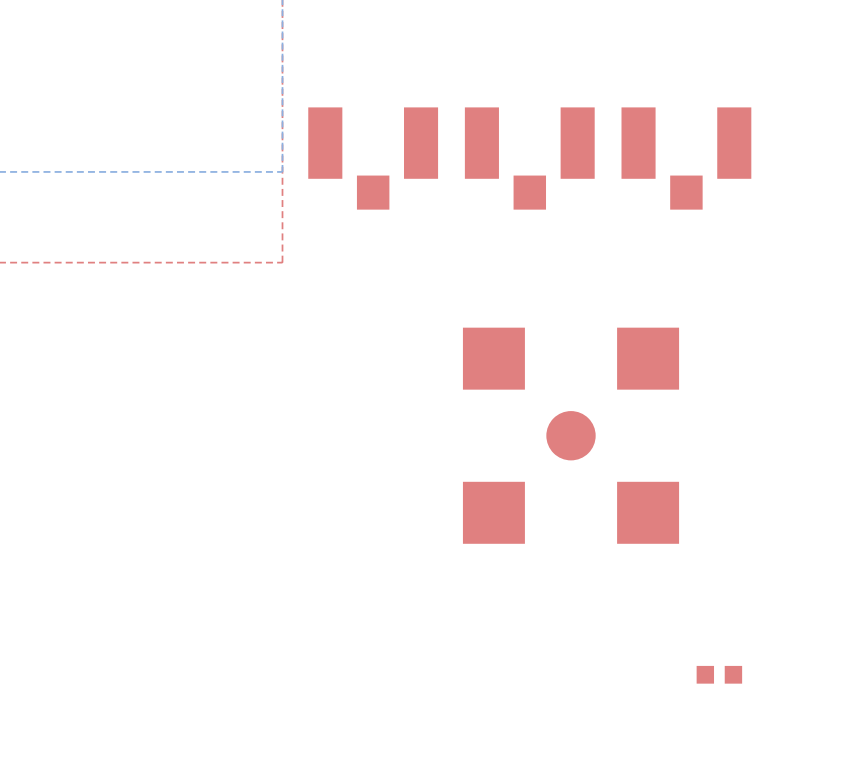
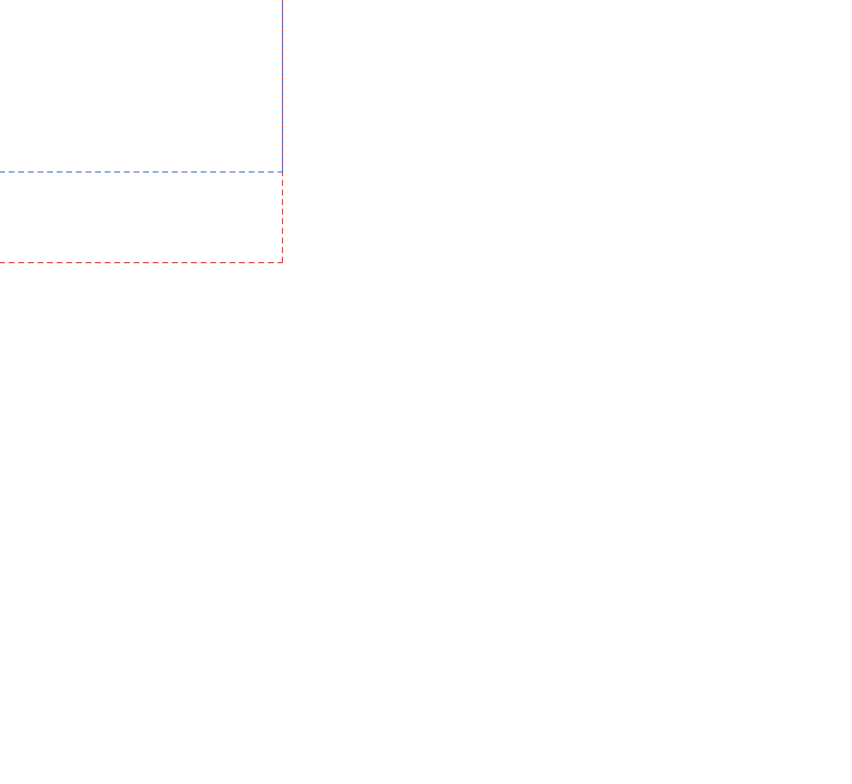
part: (373, 158) -> none
part: (529, 158) -> none
part: (686, 158) -> none
part: (571, 435) -> none
part: (719, 674) -> none

